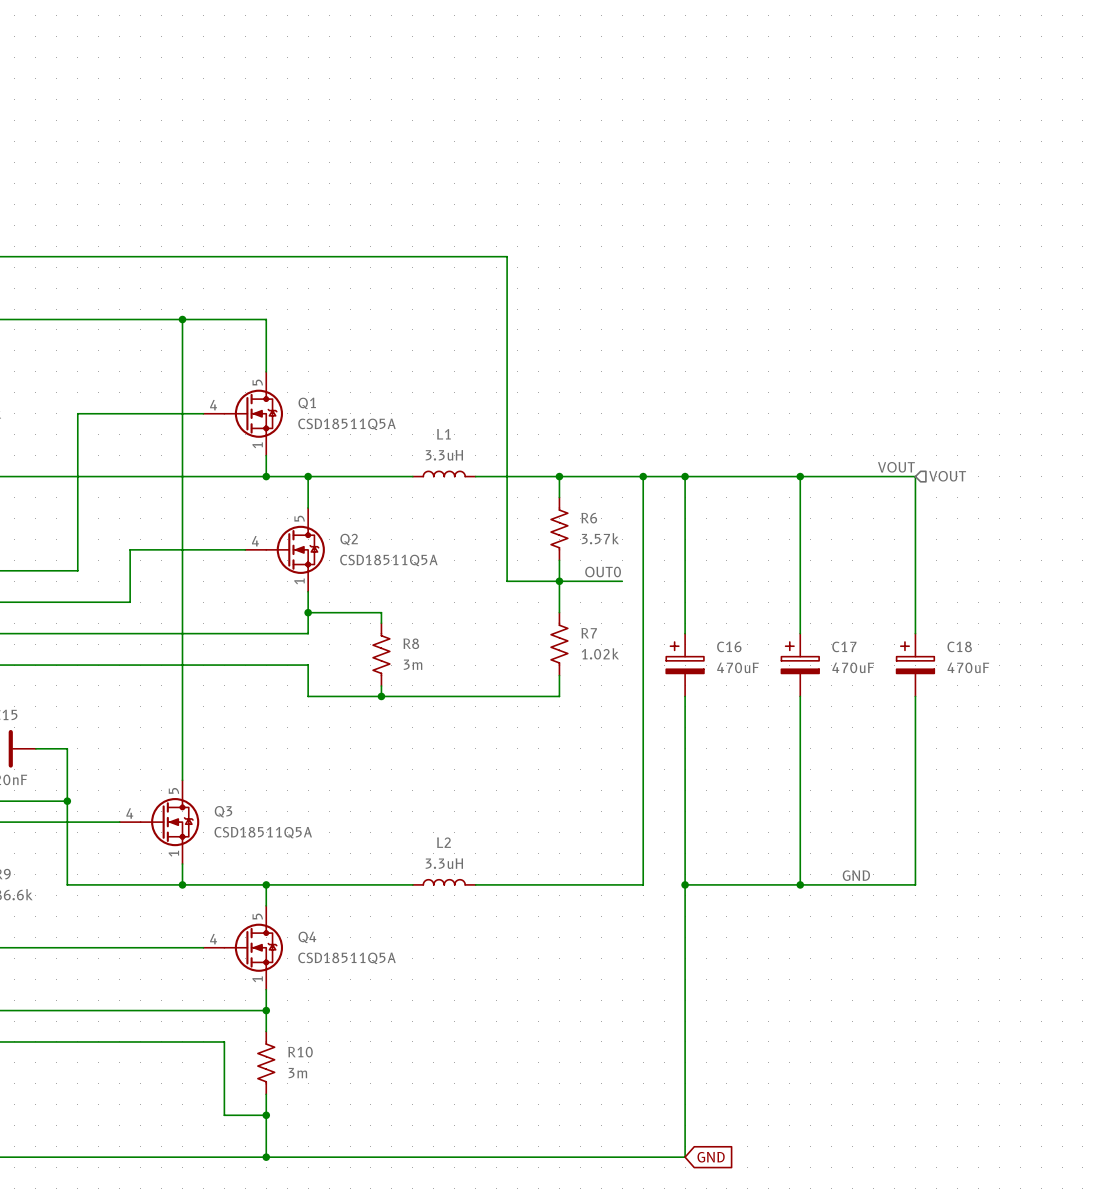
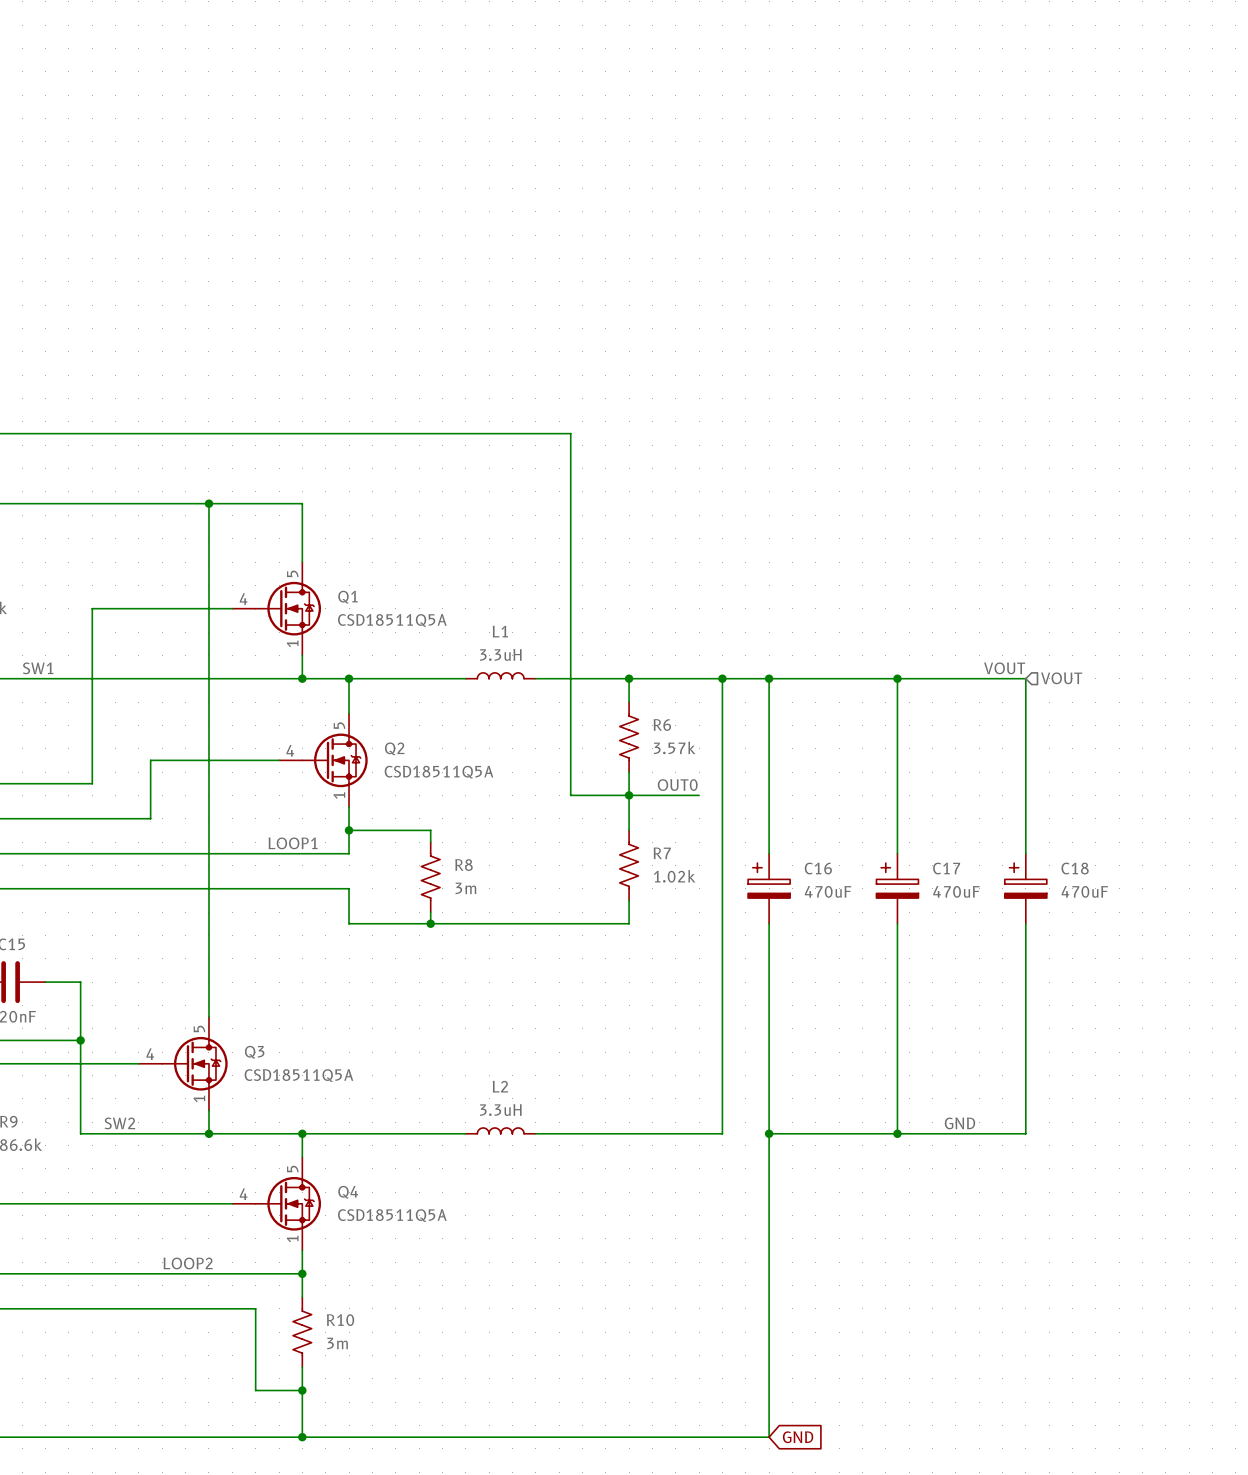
label: none -> SW1 (38, 668)
label: none -> LOOP1 (293, 843)
label: none -> SW2 (119, 1123)
label: none -> LOOP2 (188, 1263)

